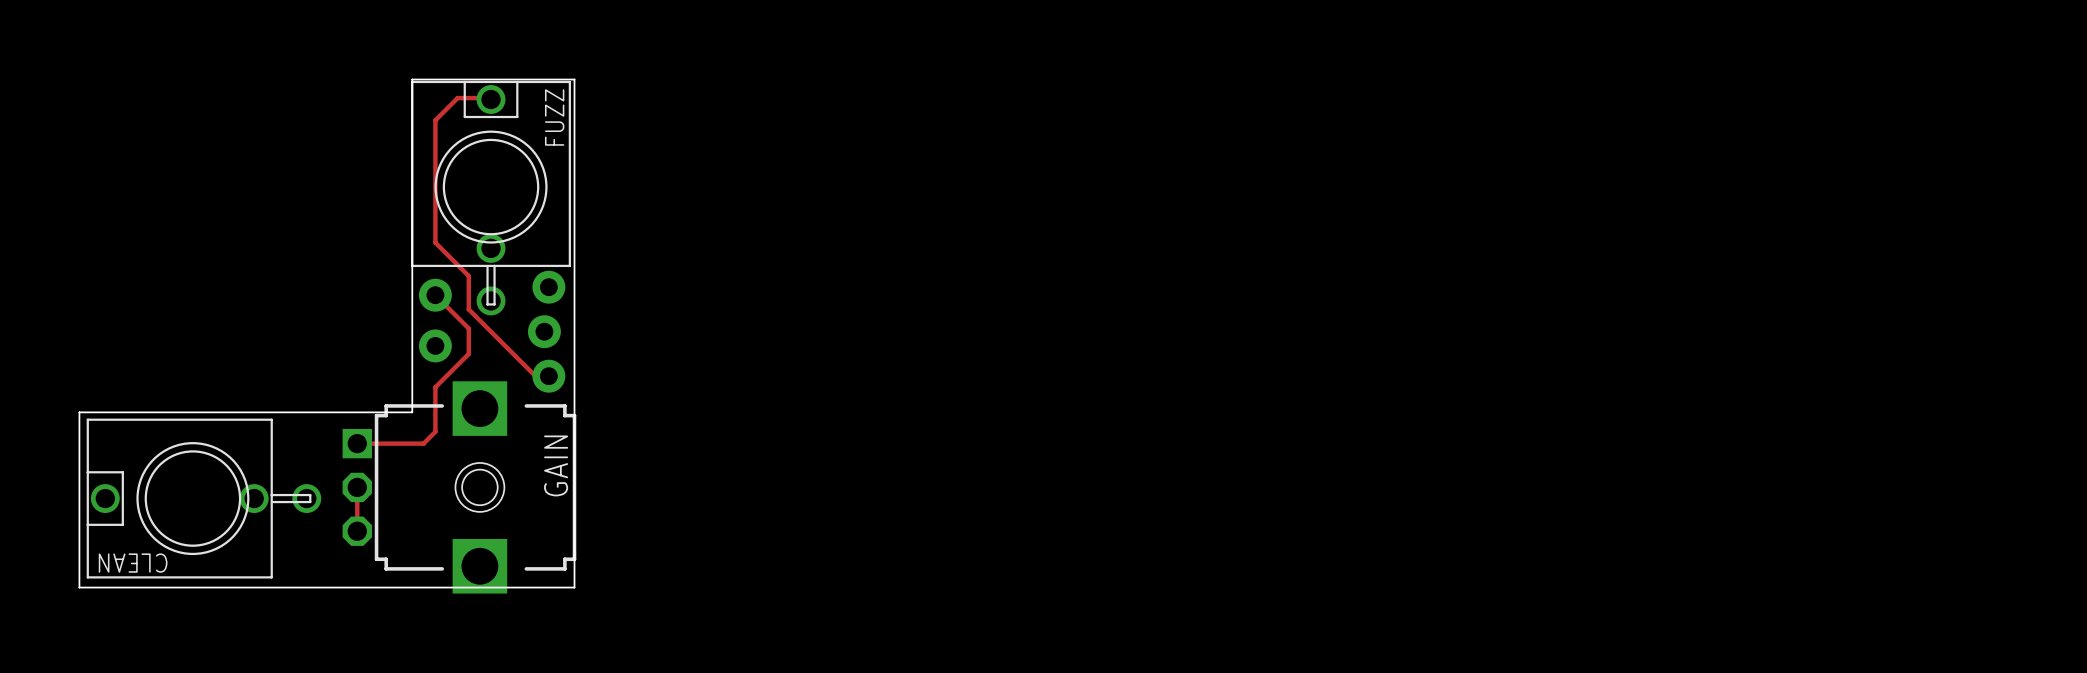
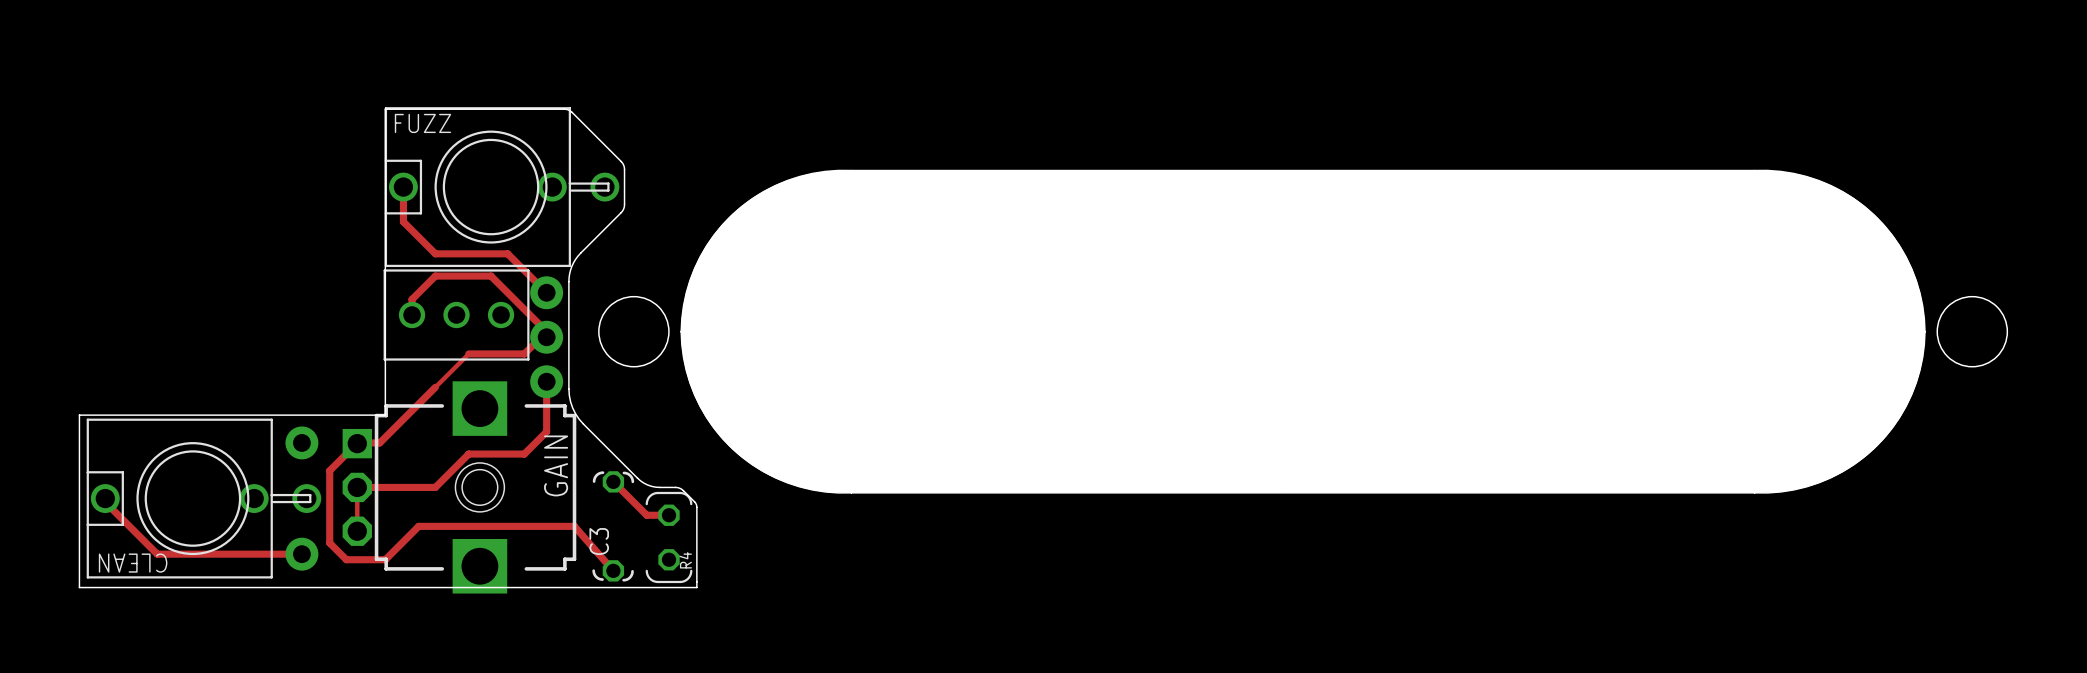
track: (491, 99) (457, 98) (435, 120) (435, 242) (468, 276) (468, 309) (535, 376) (548, 376) -> none
track: none -> (403, 187) (403, 221) (435, 253) (507, 253) (546, 292)
FUZZ rotation: 0° (491, 198) -> 90° counterclockwise (502, 187)
part footprint: [527, 270, 566, 393] -> [530, 276, 564, 399]
track: (435, 295) (468, 328) (468, 353) -> (412, 315) (412, 299) (435, 276) (491, 276) (546, 331) (546, 337) (541, 337) (524, 353) (468, 353)
part: none -> (456, 315)
part: (435, 320) -> none
part: none -> (1303, 331)
track: none -> (546, 381) (546, 431) (524, 454) (468, 454) (435, 487) (357, 487)
track: (435, 387) (435, 431) (423, 443) (357, 443) -> (435, 387) (379, 442) (357, 442) (329, 470) (329, 543) (346, 559) (385, 559) (418, 526) (574, 526) (613, 570)
board edge: (79, 415) (79, 412) (412, 412) (412, 79) (574, 79) (574, 587) -> (79, 415) (385, 415) (385, 109) (568, 110) (621, 161) (624, 169) (623, 210) (578, 256) (569, 273) (568, 388) (570, 401) (575, 413) (583, 424) (640, 480) (655, 487) (679, 488) (695, 502) (696, 507) (696, 587) (574, 587)
part: none -> (301, 442)
track: none -> (613, 481) (646, 515) (669, 515)
track: none -> (105, 498) (101, 498) (157, 554) (301, 554)
C3: none -> (613, 526)
R4: none -> (669, 537)
part: none -> (301, 554)

